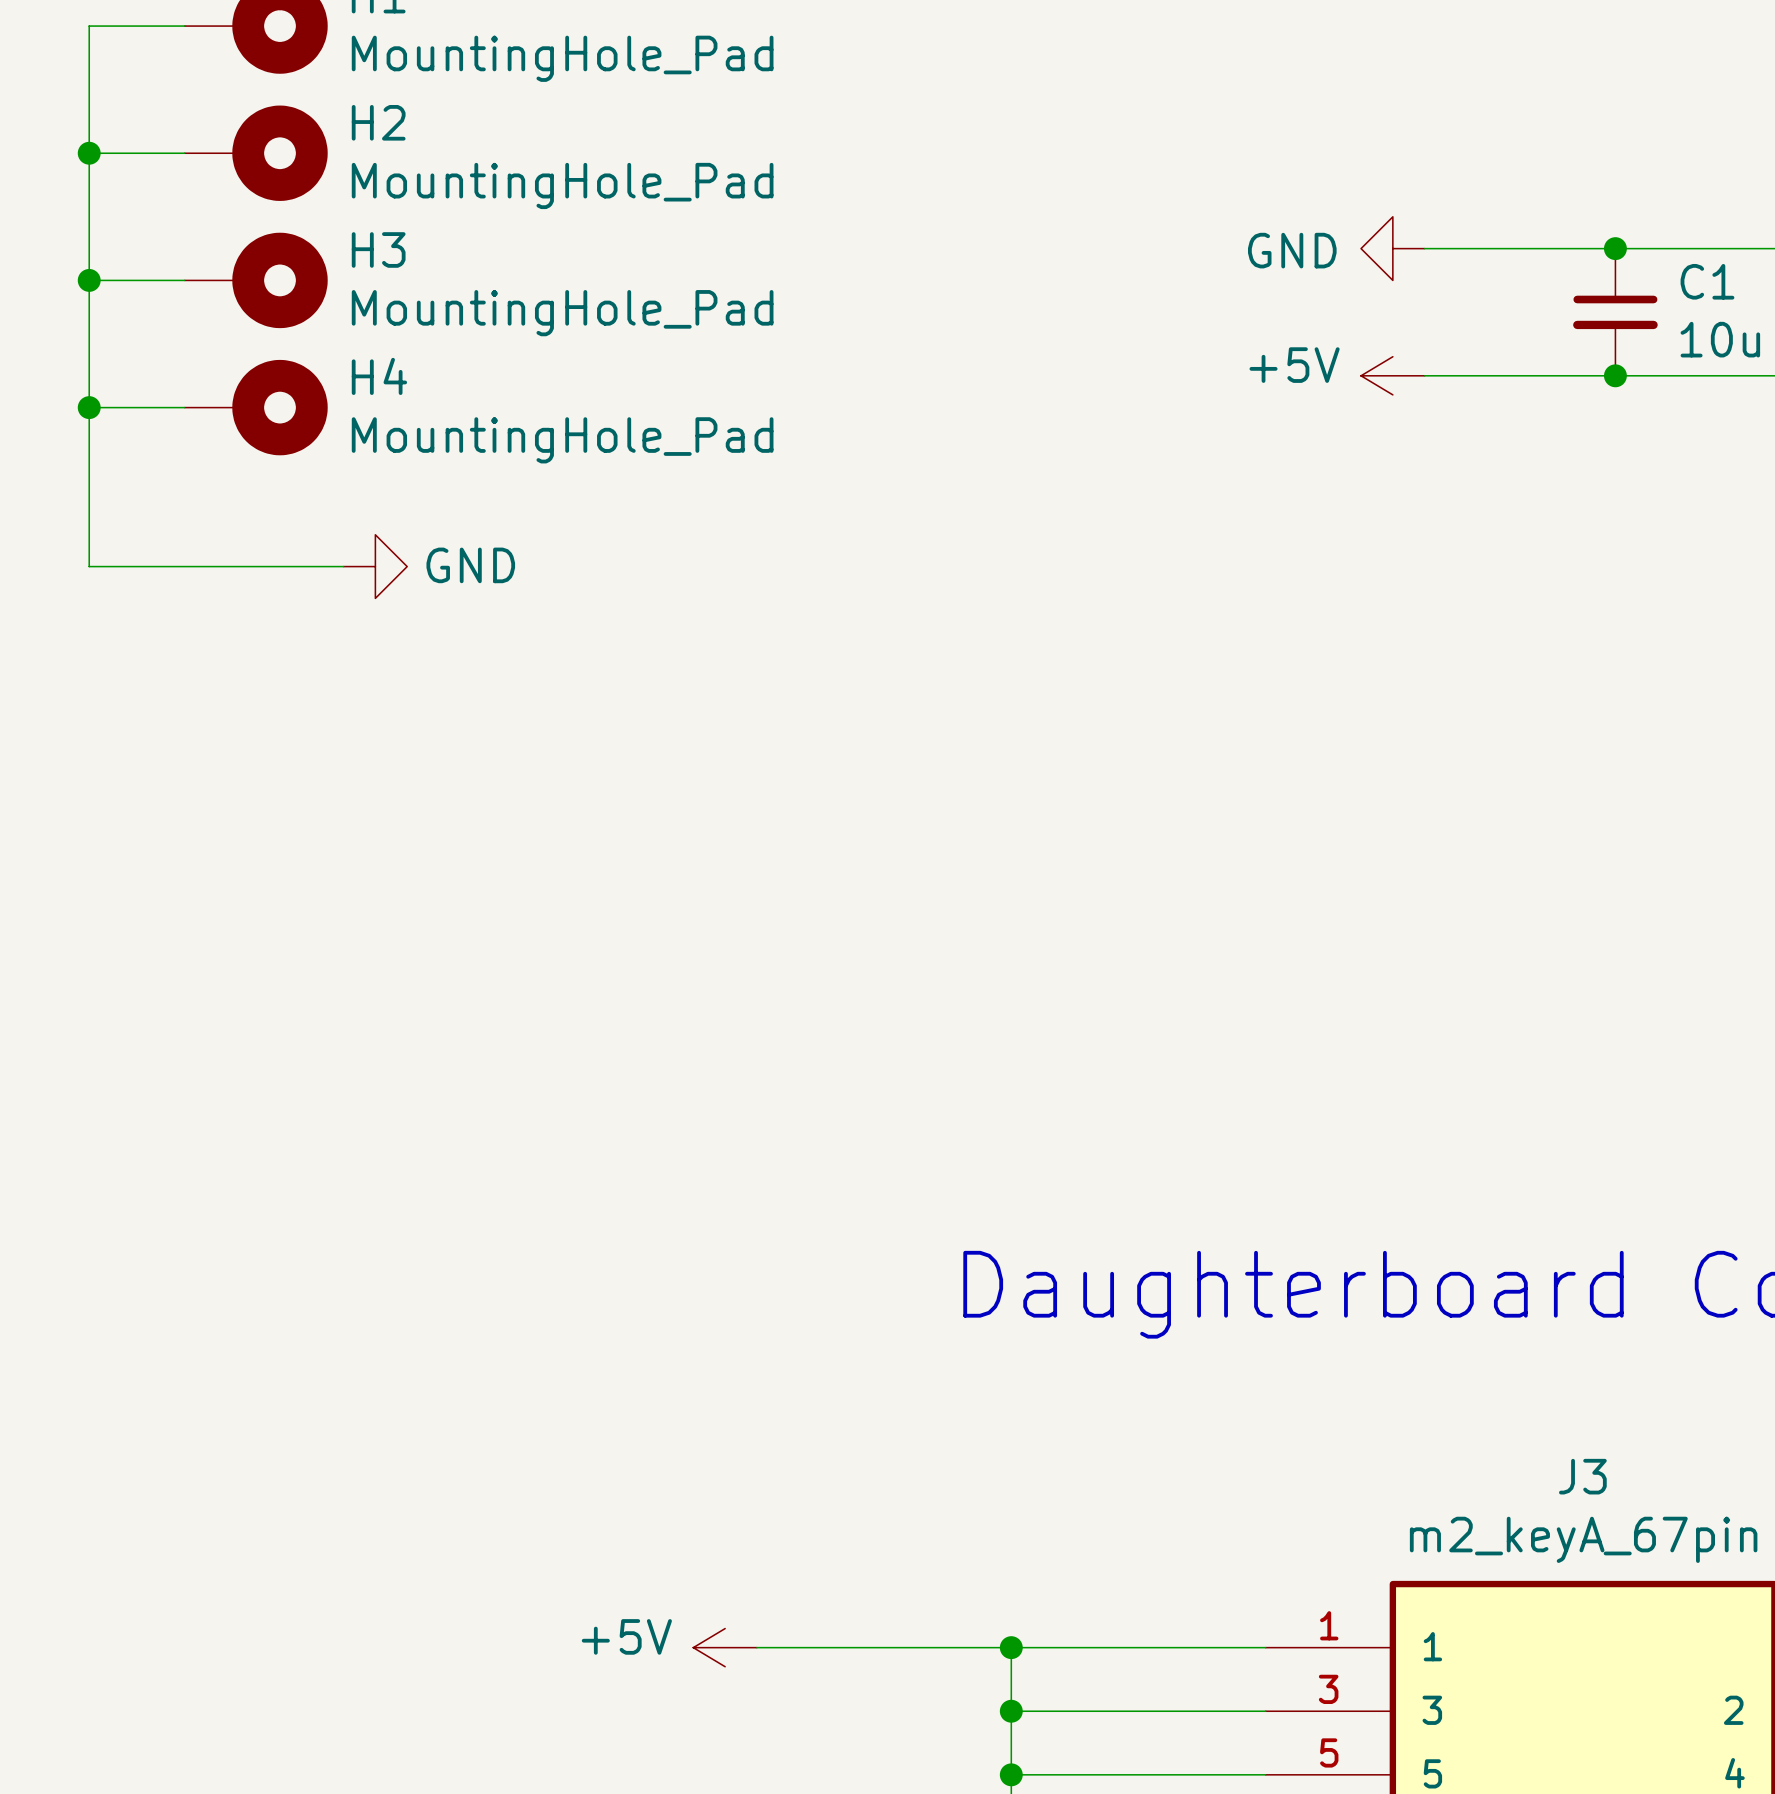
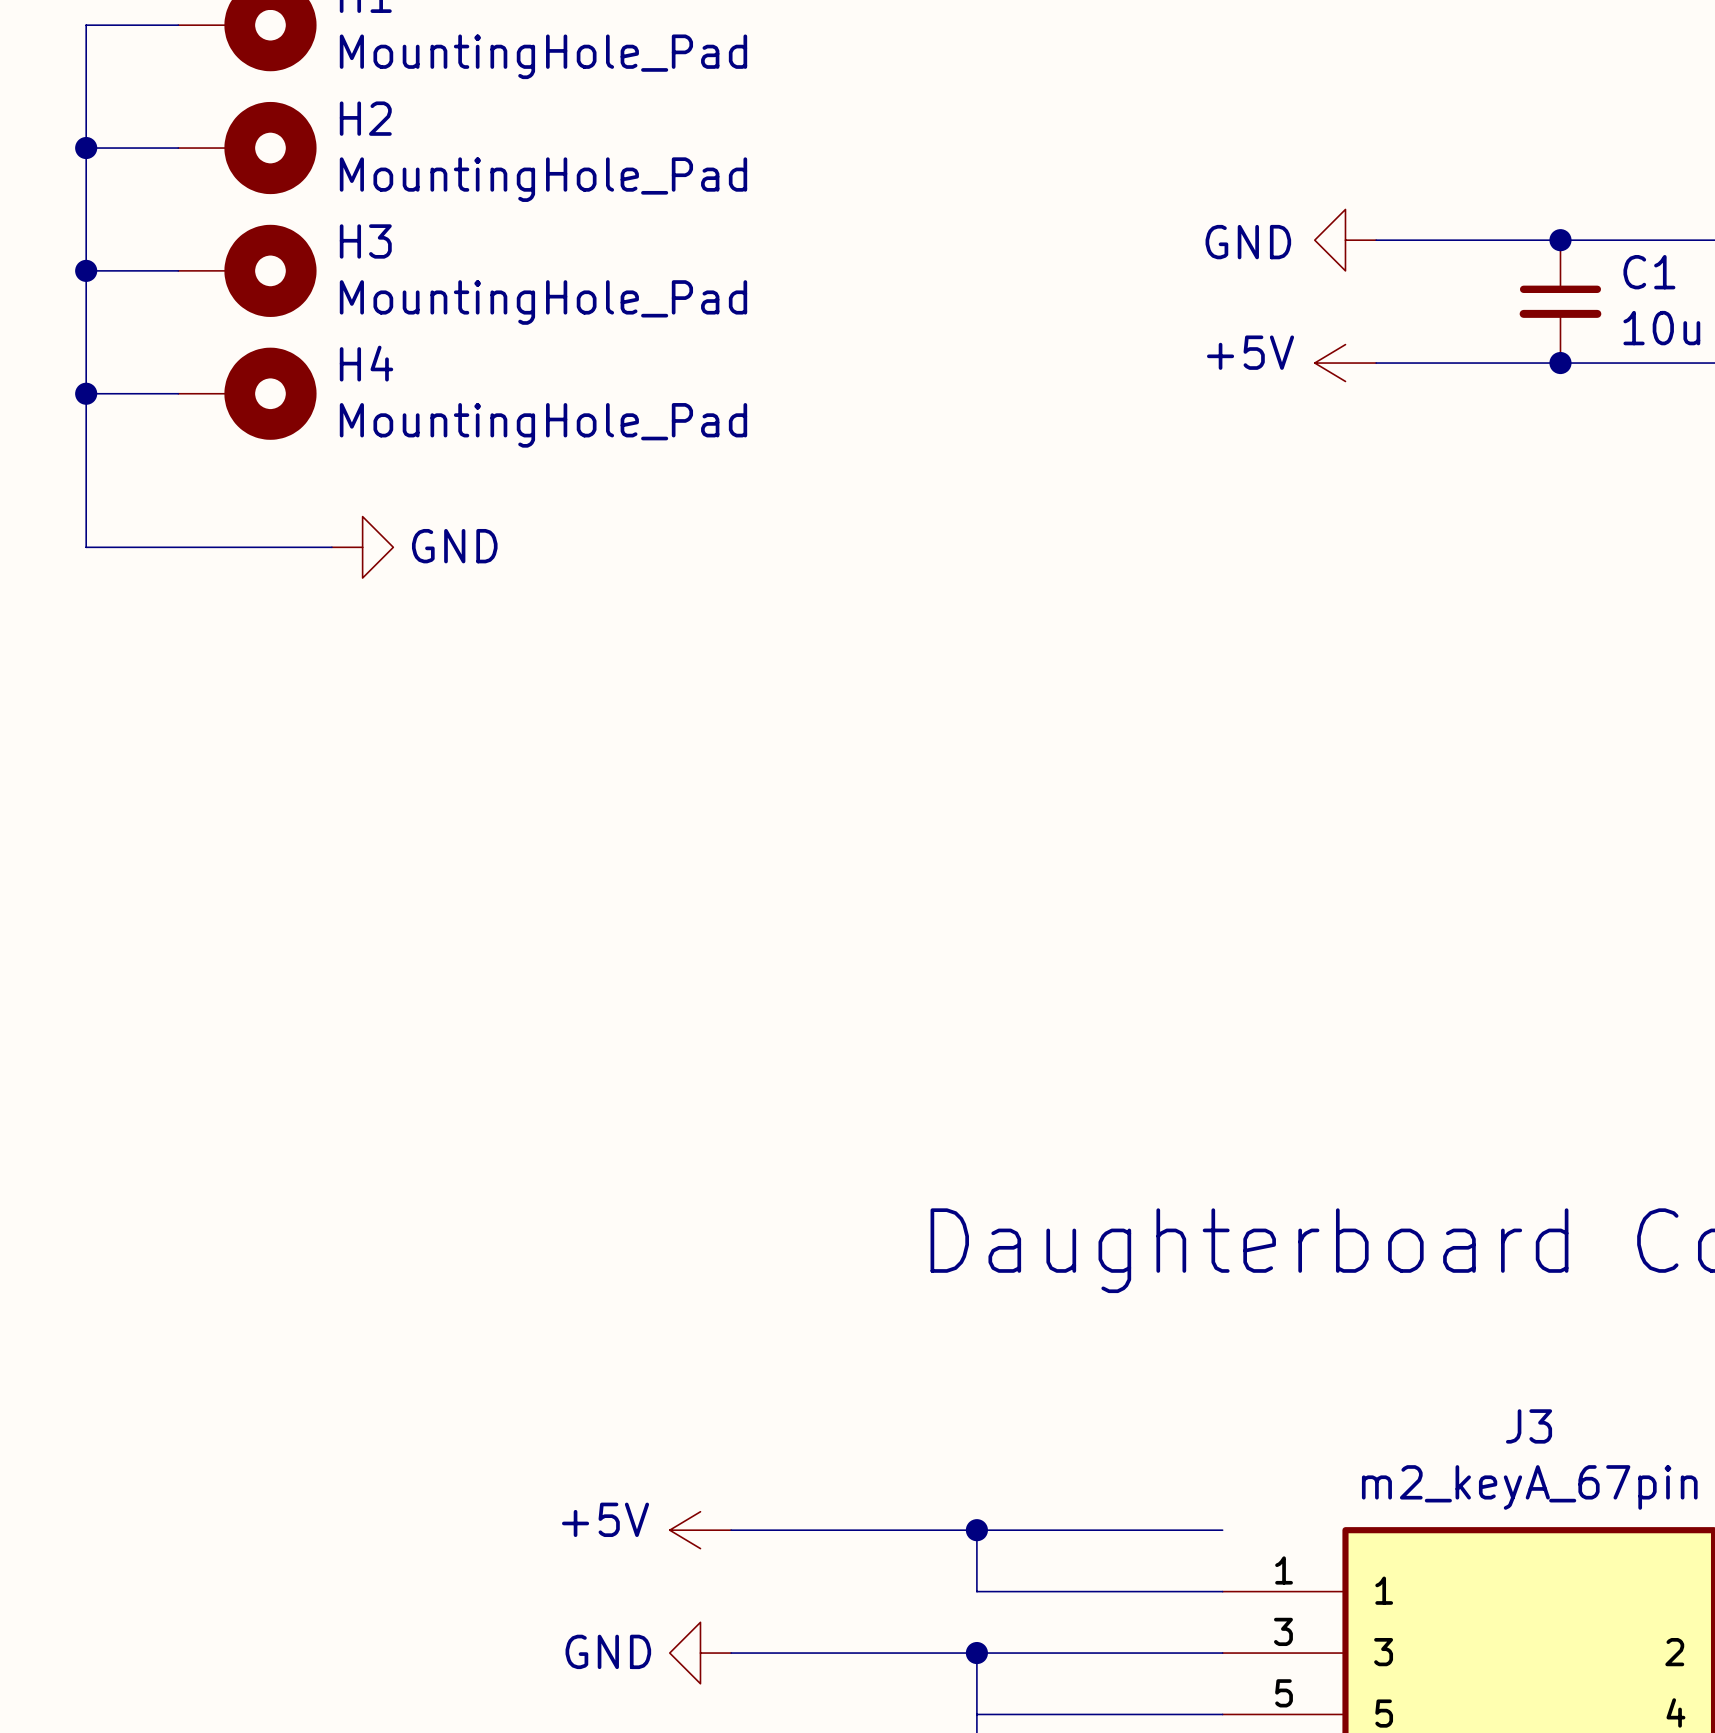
wire: none -> (731, 1530) (1222, 1530)
wire: none -> (976, 1530) (976, 1591)
power symbol position: +5V (725, 1647) -> +5V (700, 1530)
wire: (756, 1647) (1011, 1647) (1011, 1711) -> (731, 1653) (976, 1653)
junction position: (1011, 1647) -> (976, 1530)
power symbol: none -> GND (700, 1653)
junction: (1011, 1774) -> none

